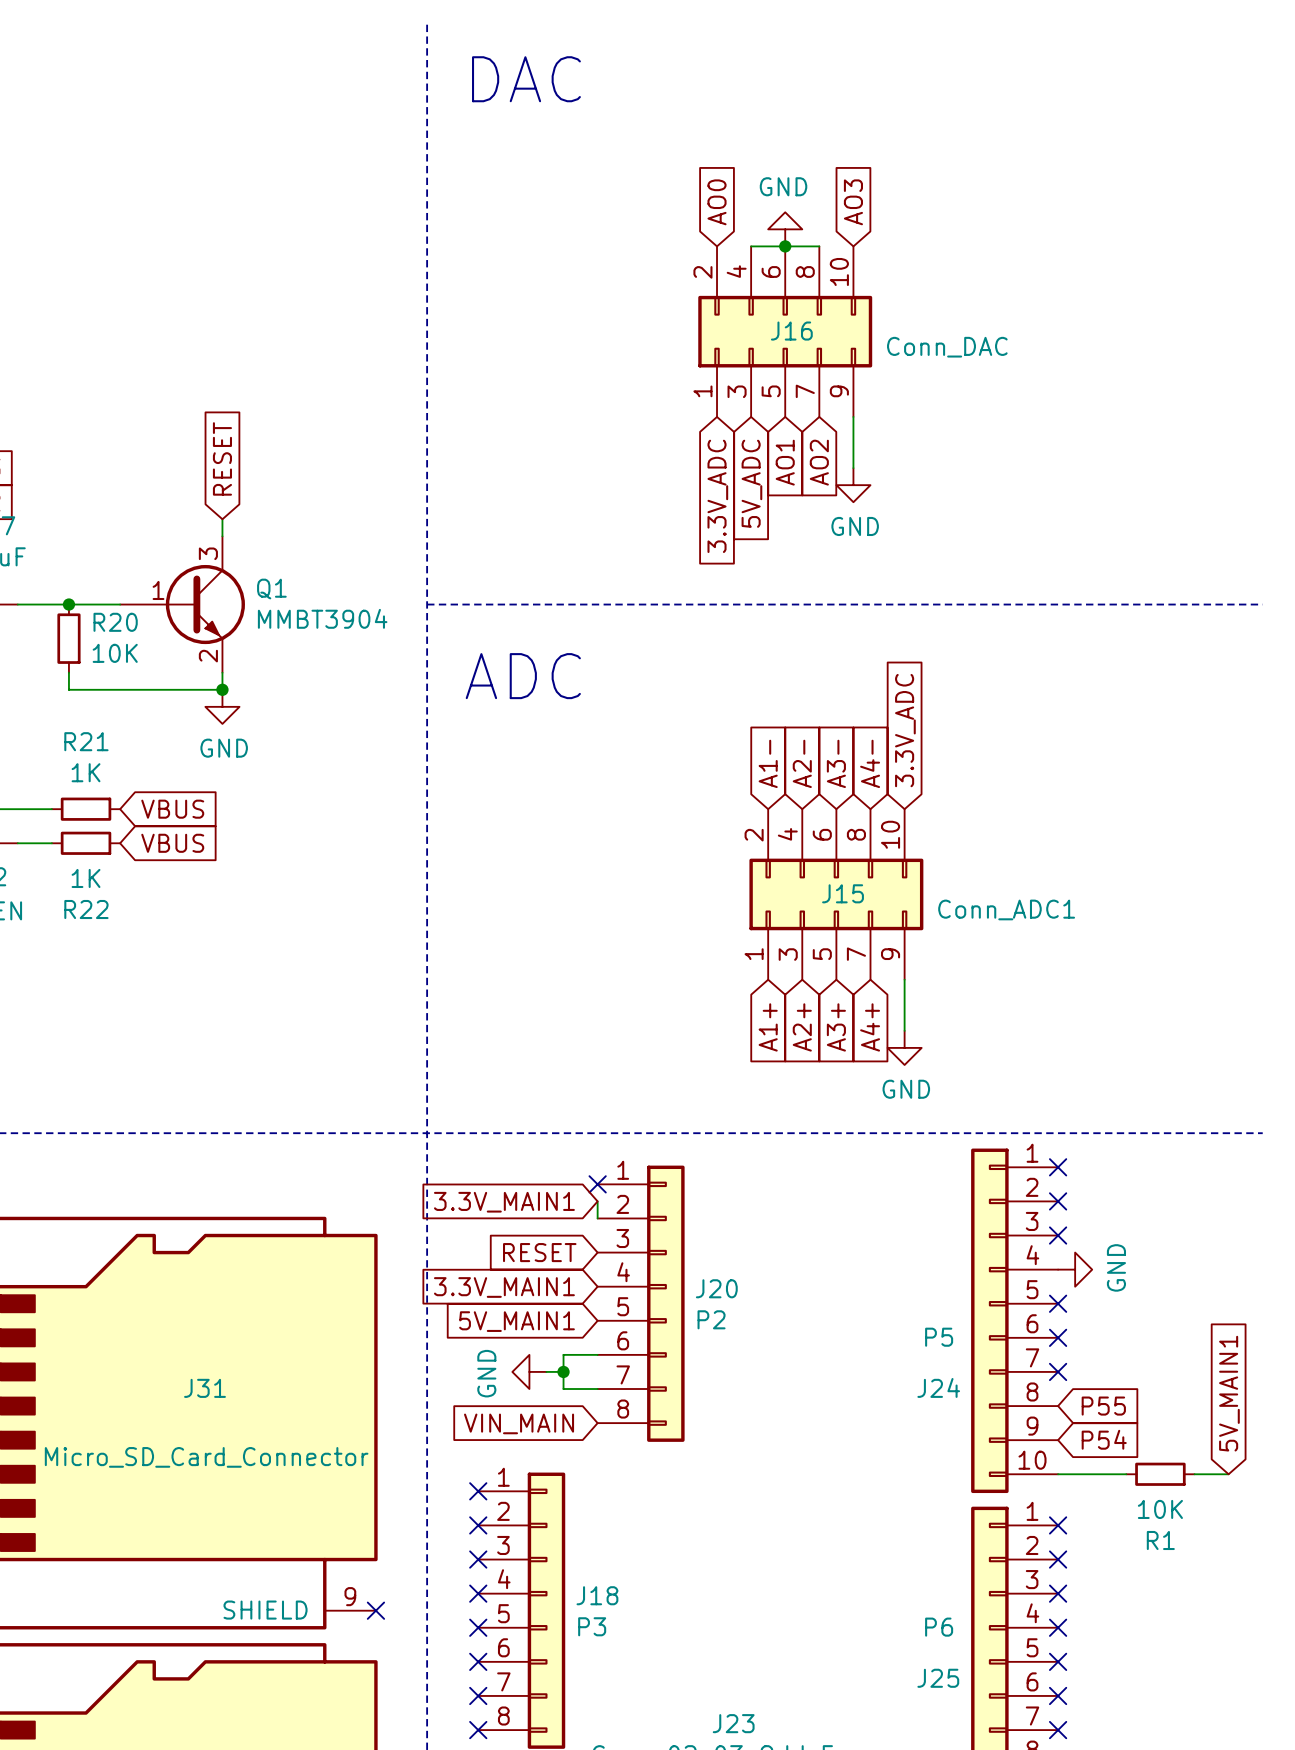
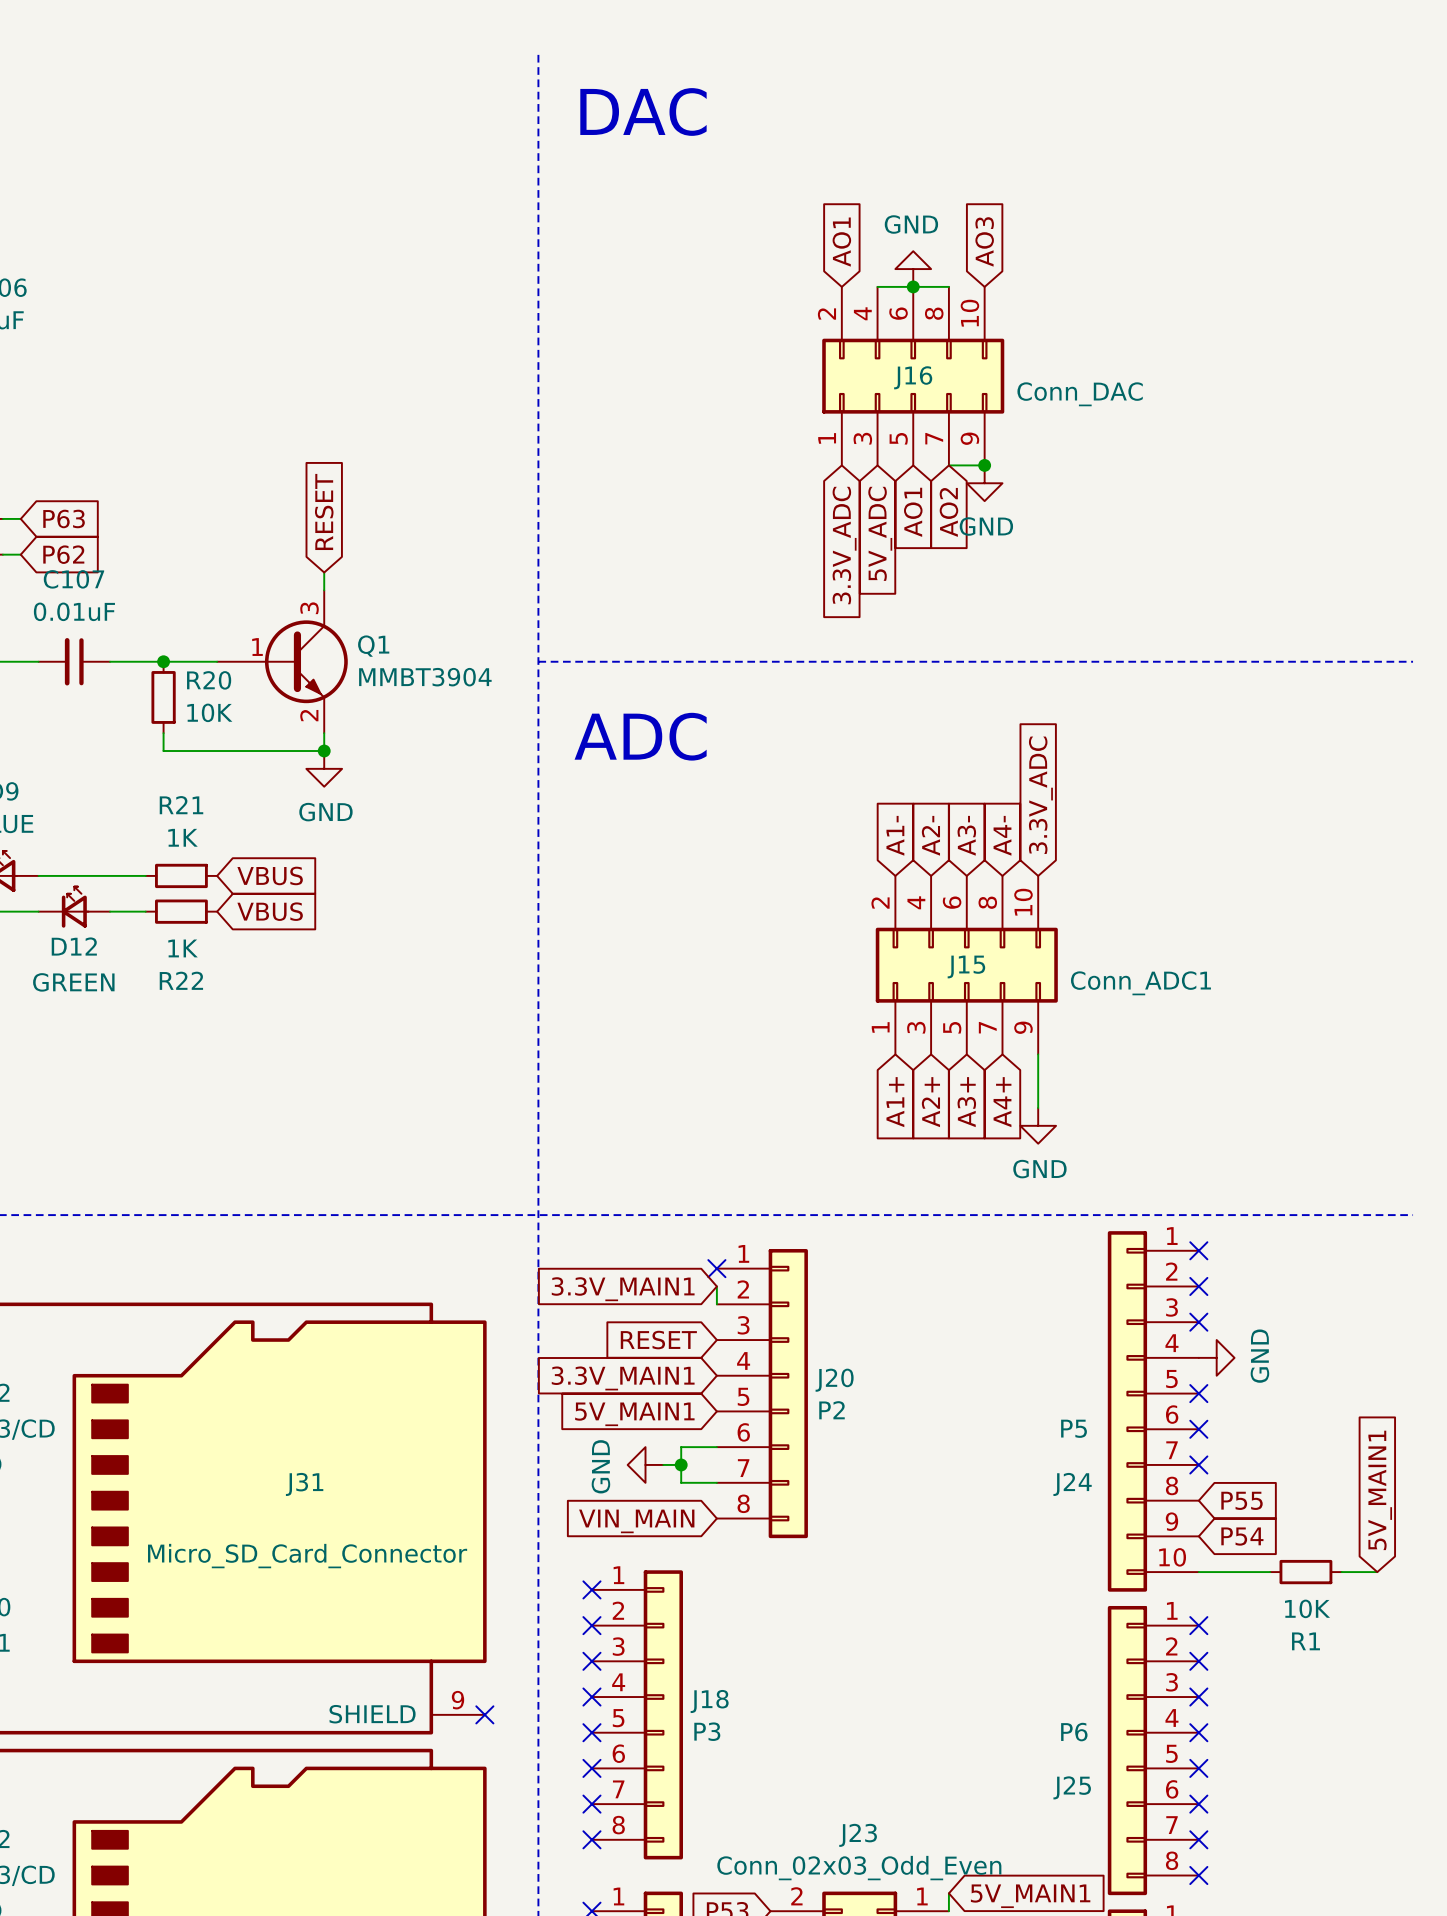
global label: AO0 (717, 202) -> AO1 (841, 242)
wire: (853, 416) (853, 468) -> (984, 465) (948, 465)
junction: none -> (984, 465)
power symbol position: GND (853, 485) -> GND (984, 483)

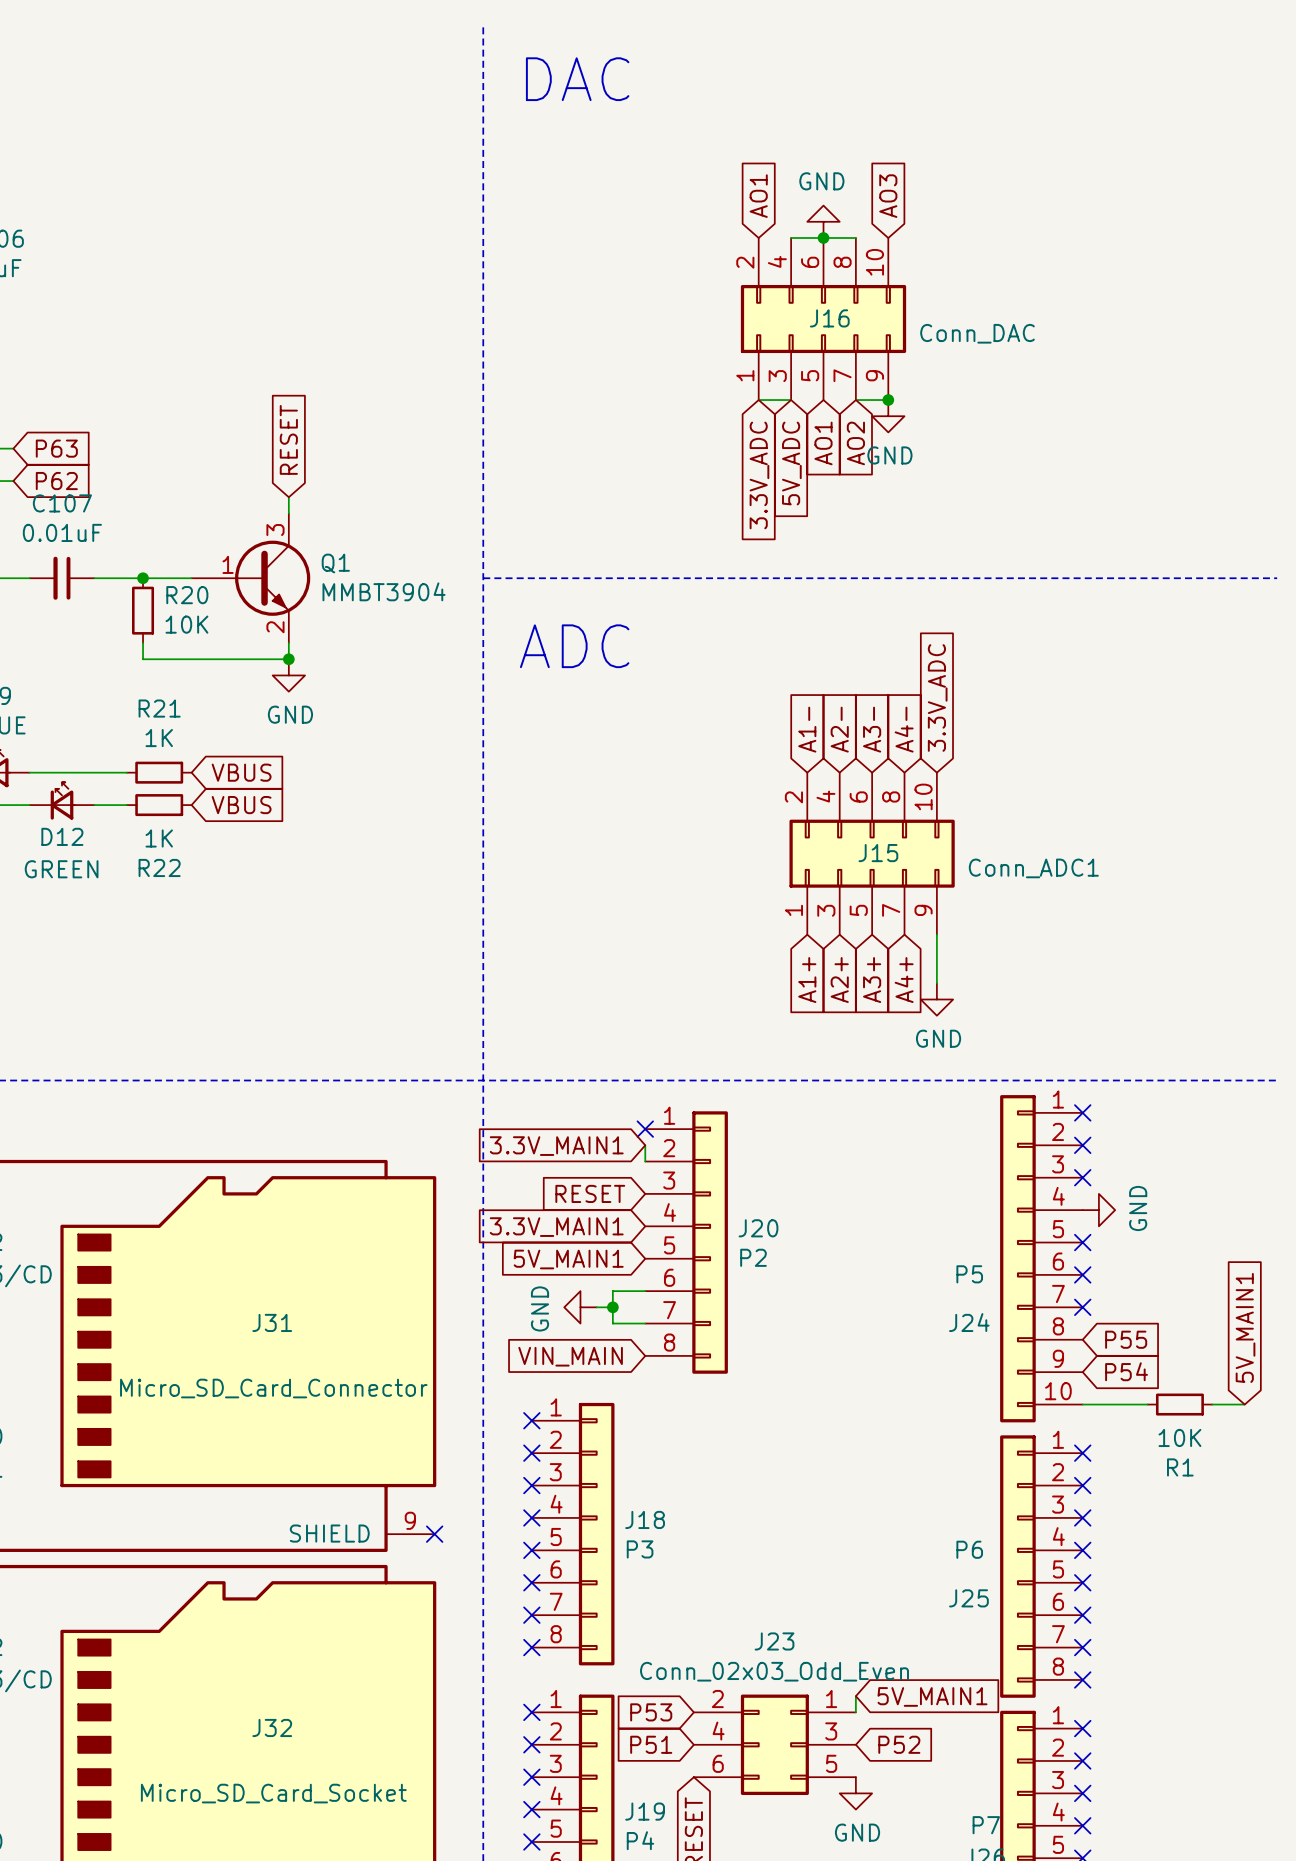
wire: none -> (758, 400) (791, 400)

